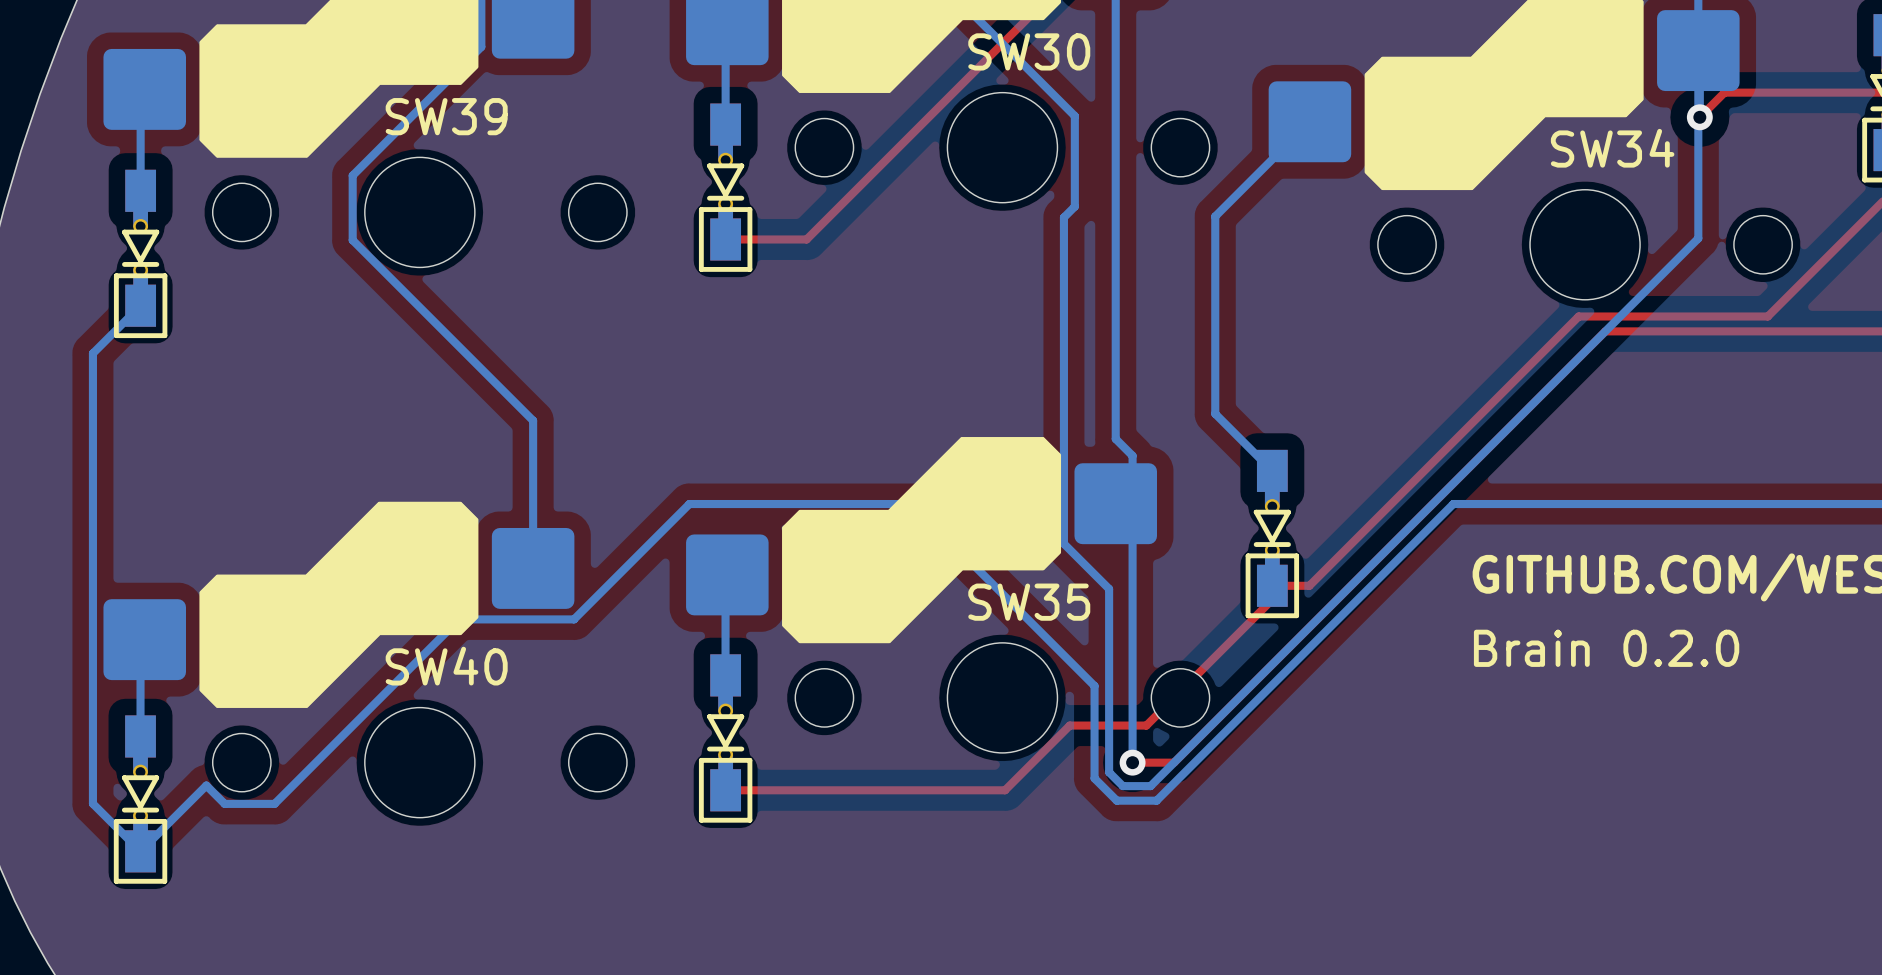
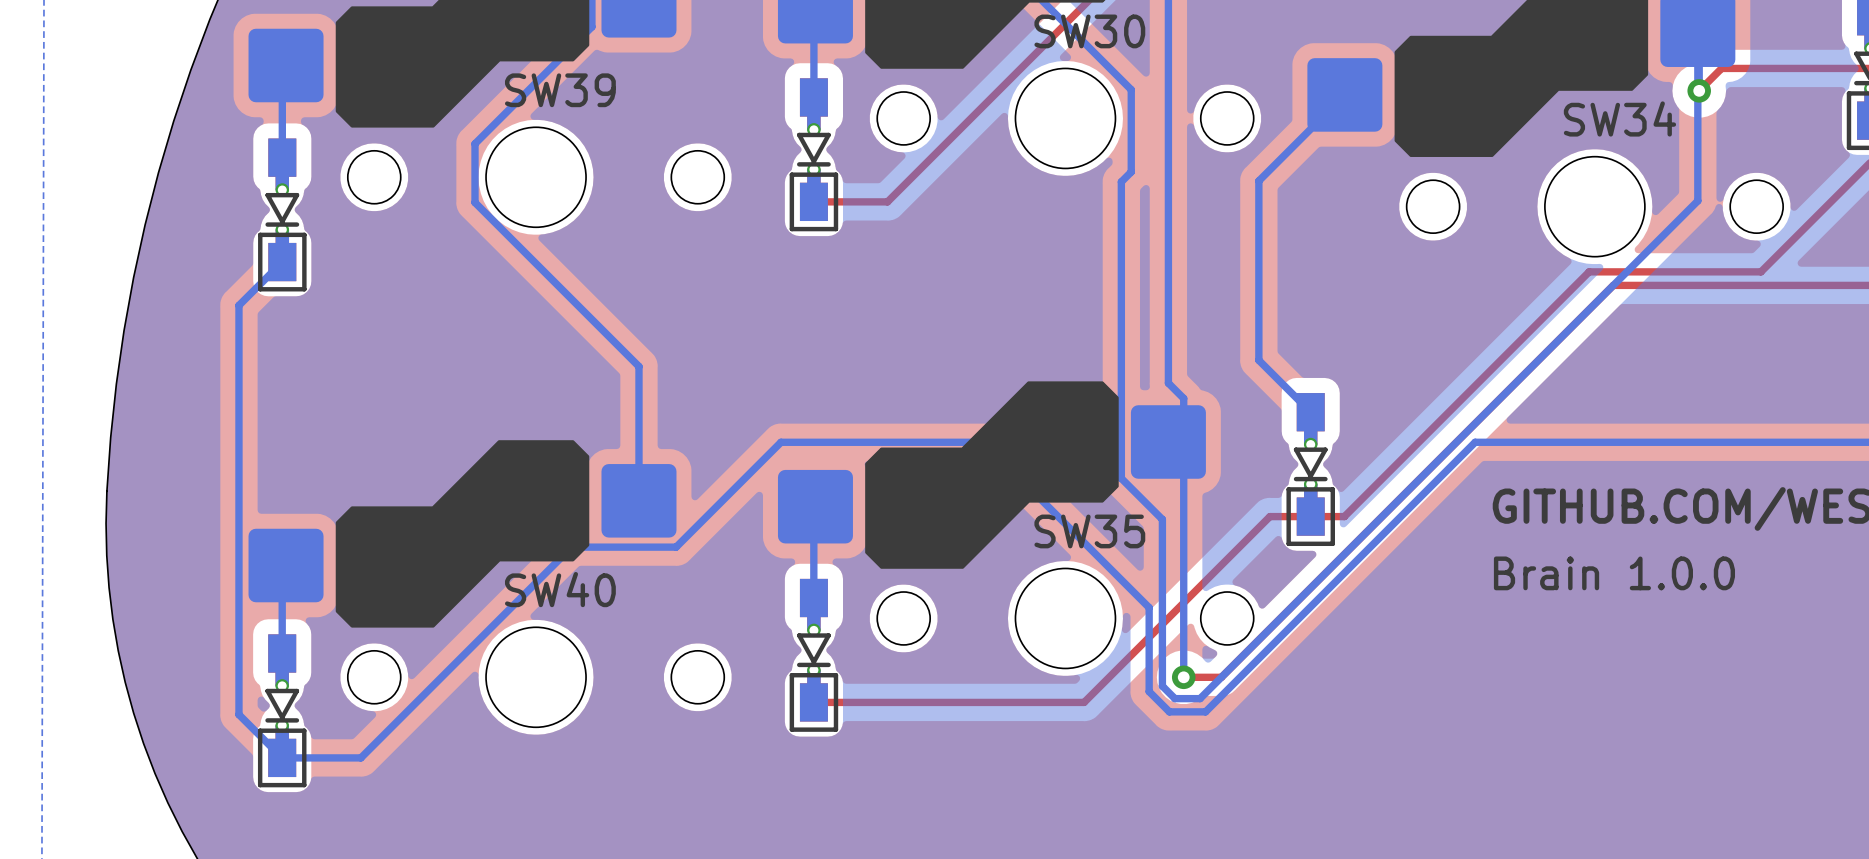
top track: (1272, 585) (1272, 599) (1146, 725) (1069, 725) (1005, 790) -> (1310, 516) (1269, 516) (1084, 702) (1067, 702)
text: Brain 0.2.0 (1606, 648) -> Brain 1.0.0 (1614, 573)
bottom track: (274, 803) (224, 803) (206, 785) (140, 851) -> (404, 714) (360, 757) (282, 757)

